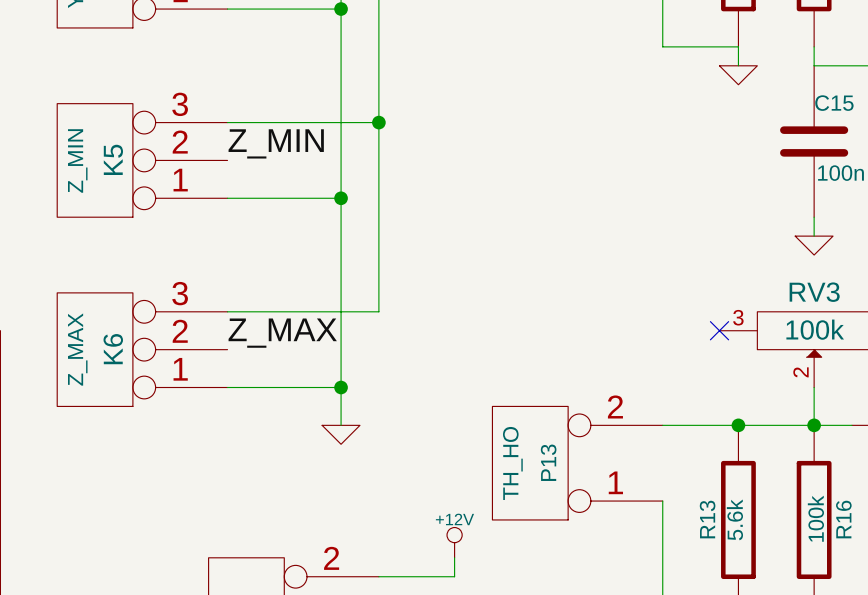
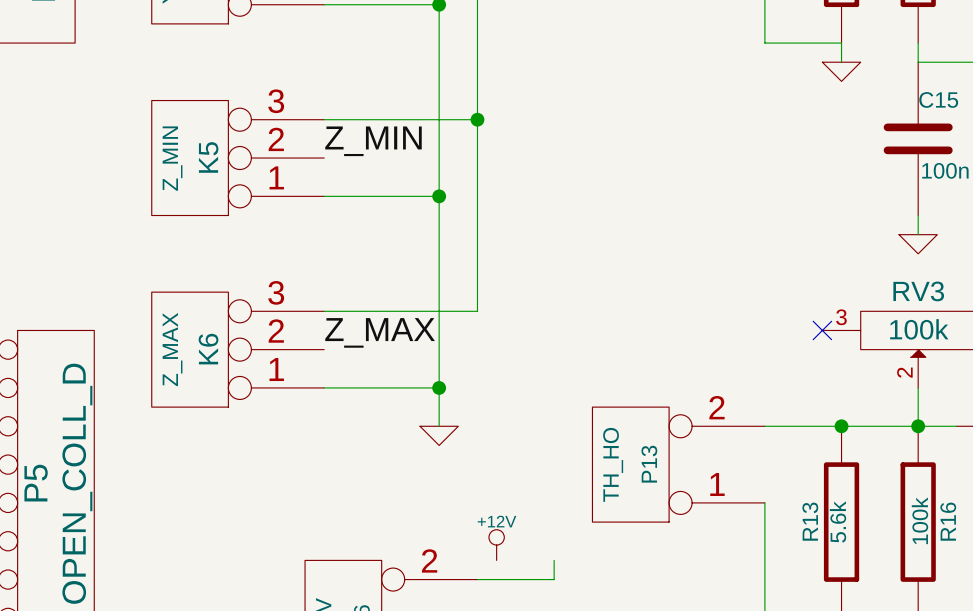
power symbol position: +12V (454, 542) -> +12V (496, 545)

